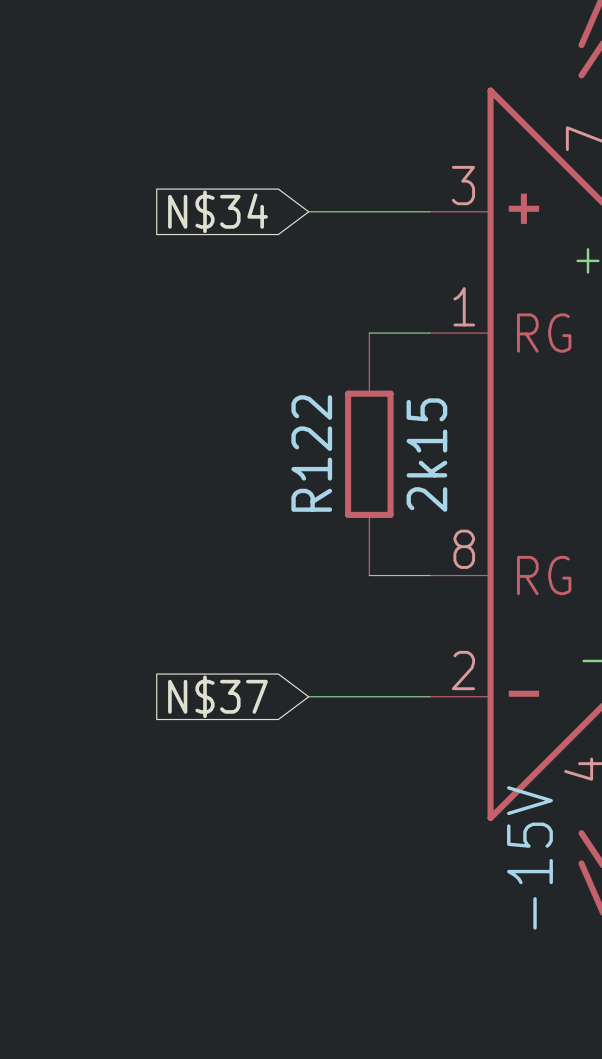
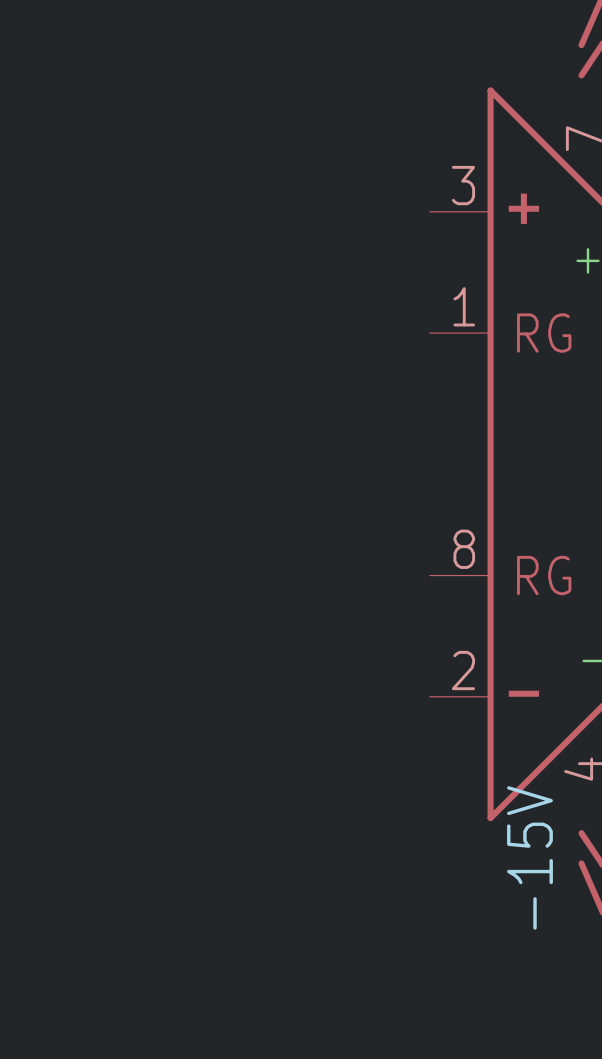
global label: N$34 (217, 211) -> none
wire: (308, 211) (429, 211) -> none
wire: (369, 333) (429, 333) -> none
R122: 2k15 (369, 454) -> none
wire: (369, 575) (429, 575) -> none
global label: N$37 (217, 696) -> none
wire: (308, 696) (429, 696) -> none

